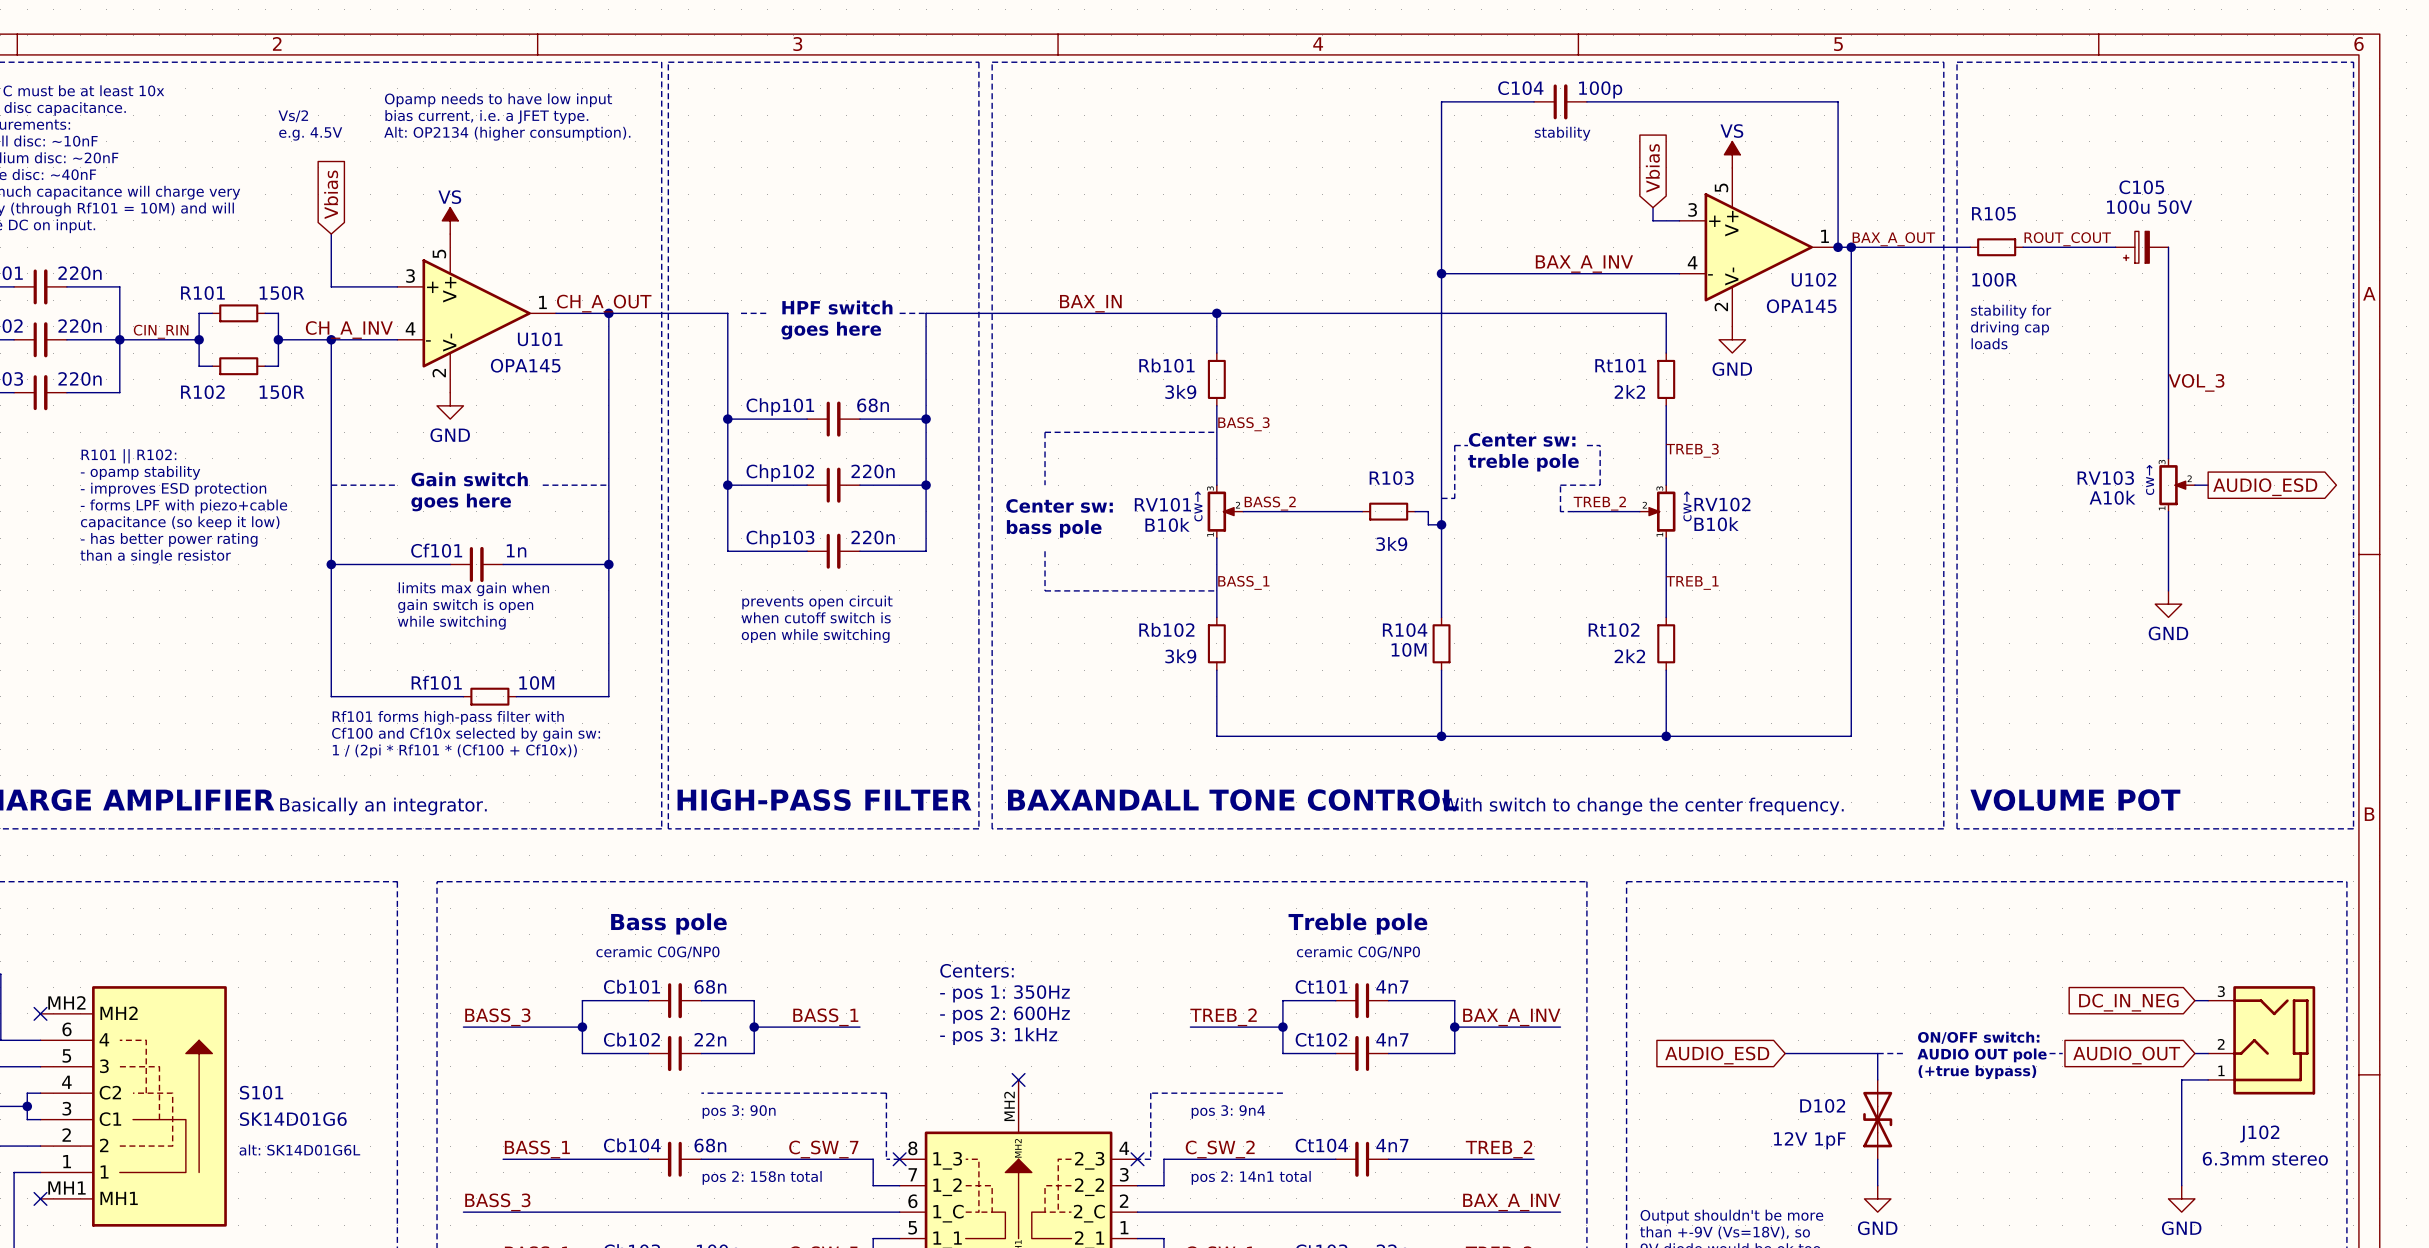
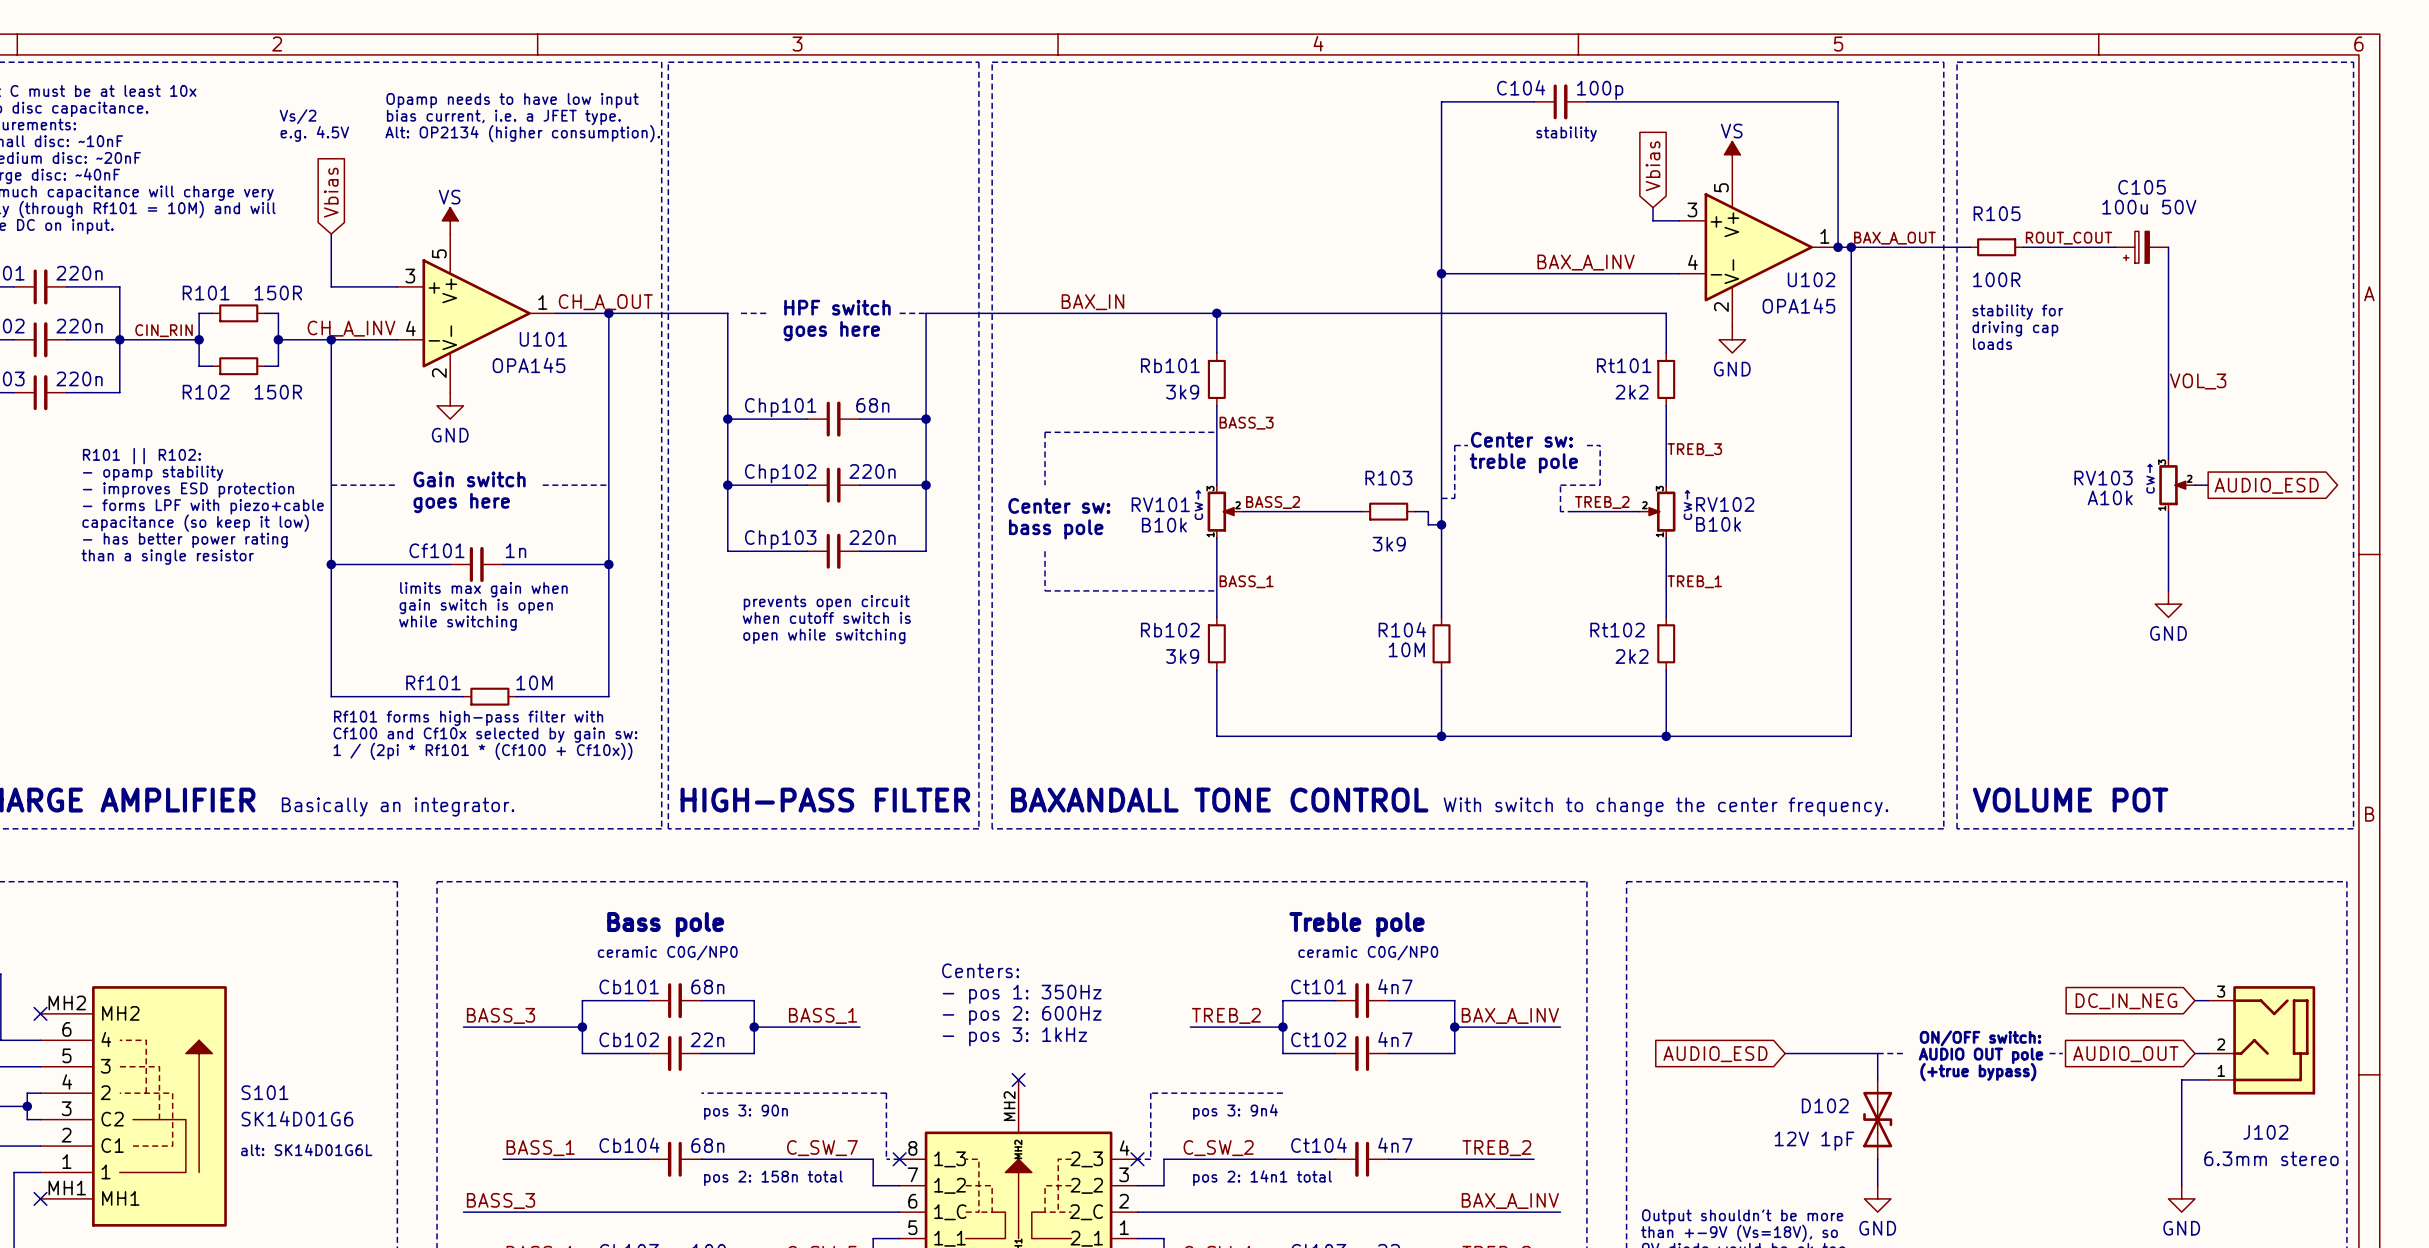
S101 symbol: [40, 986, 227, 1227] -> [40, 986, 227, 1227]

